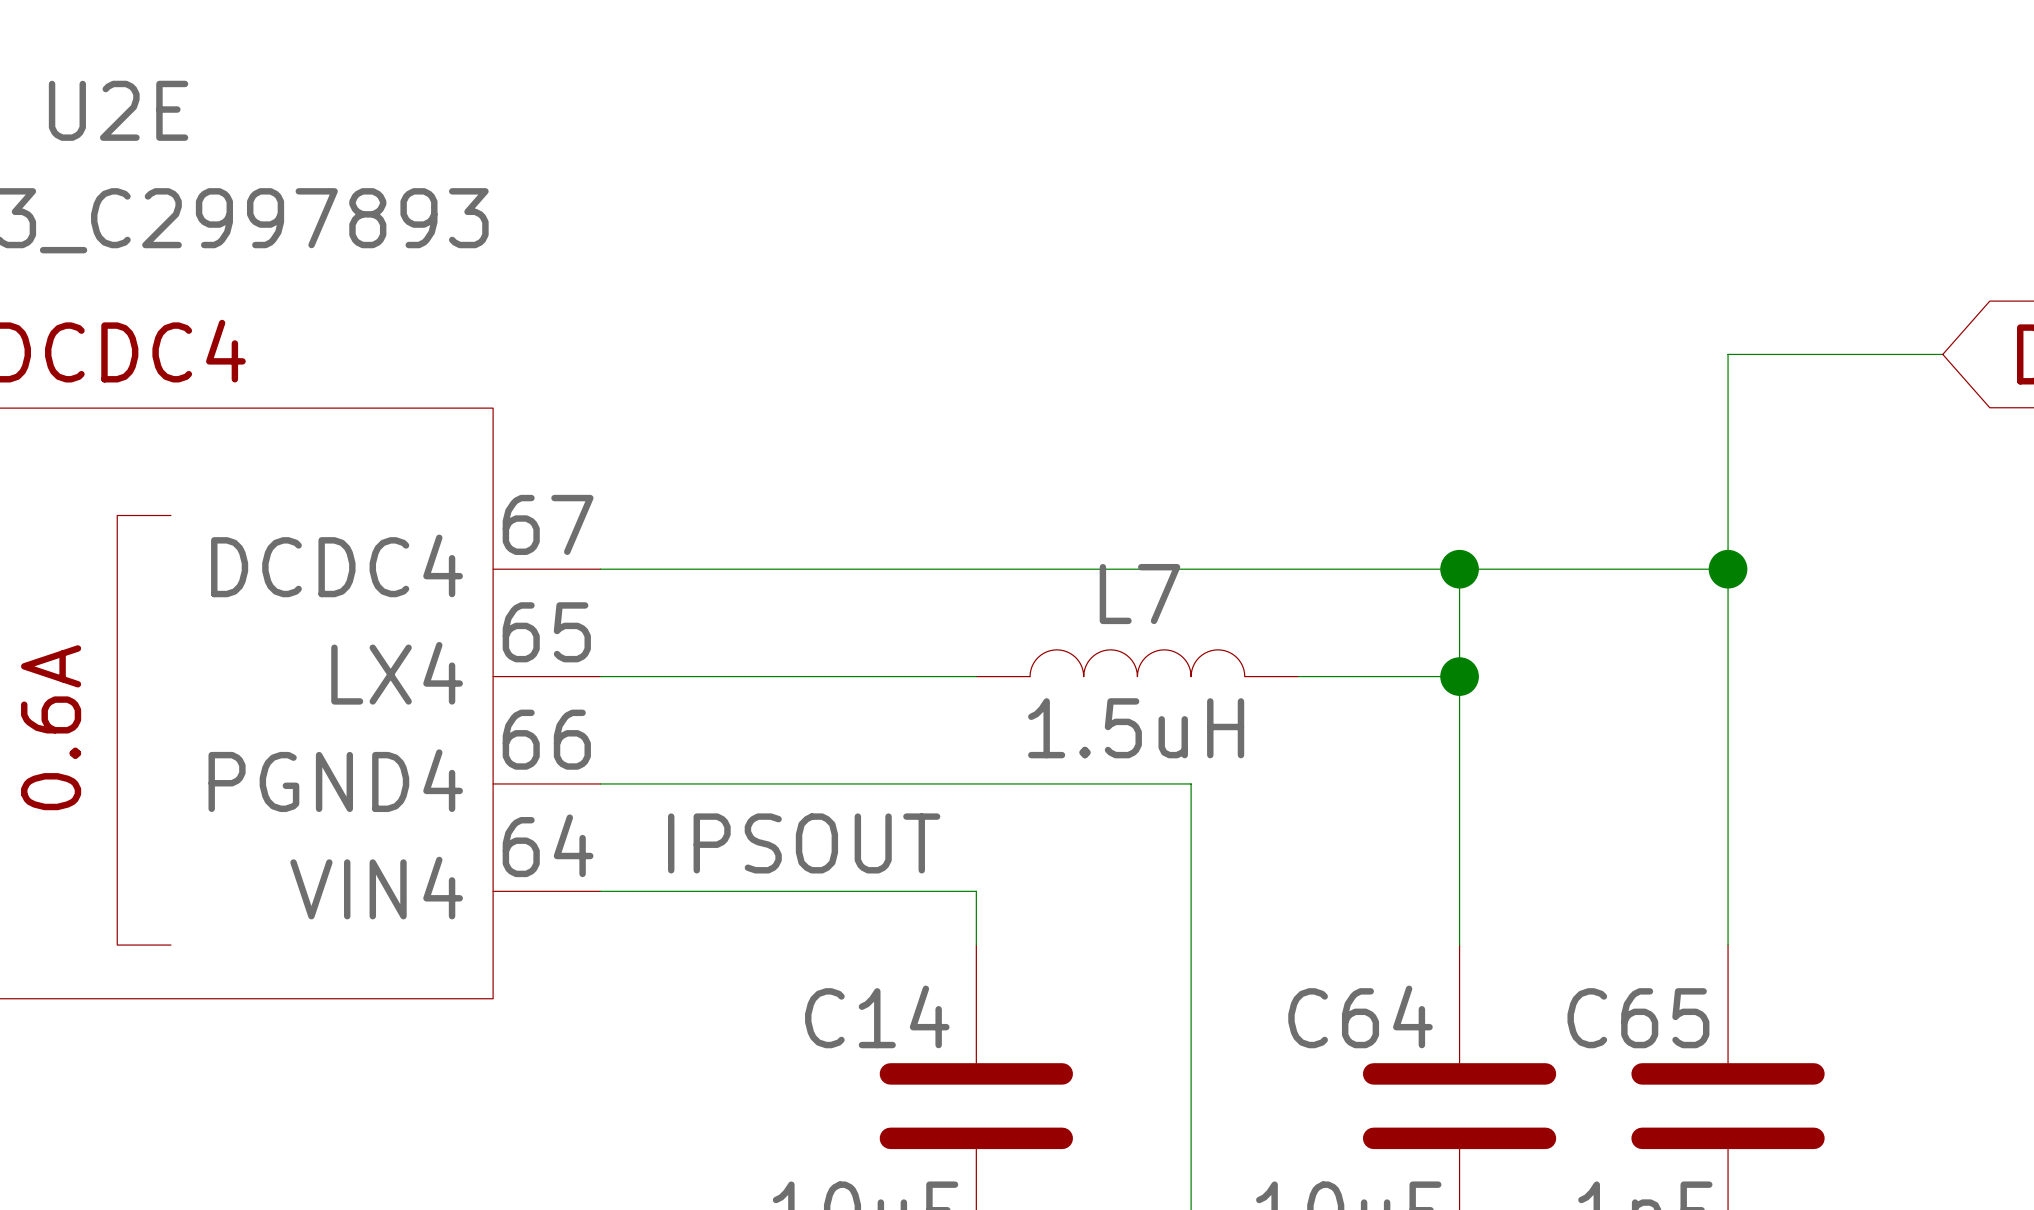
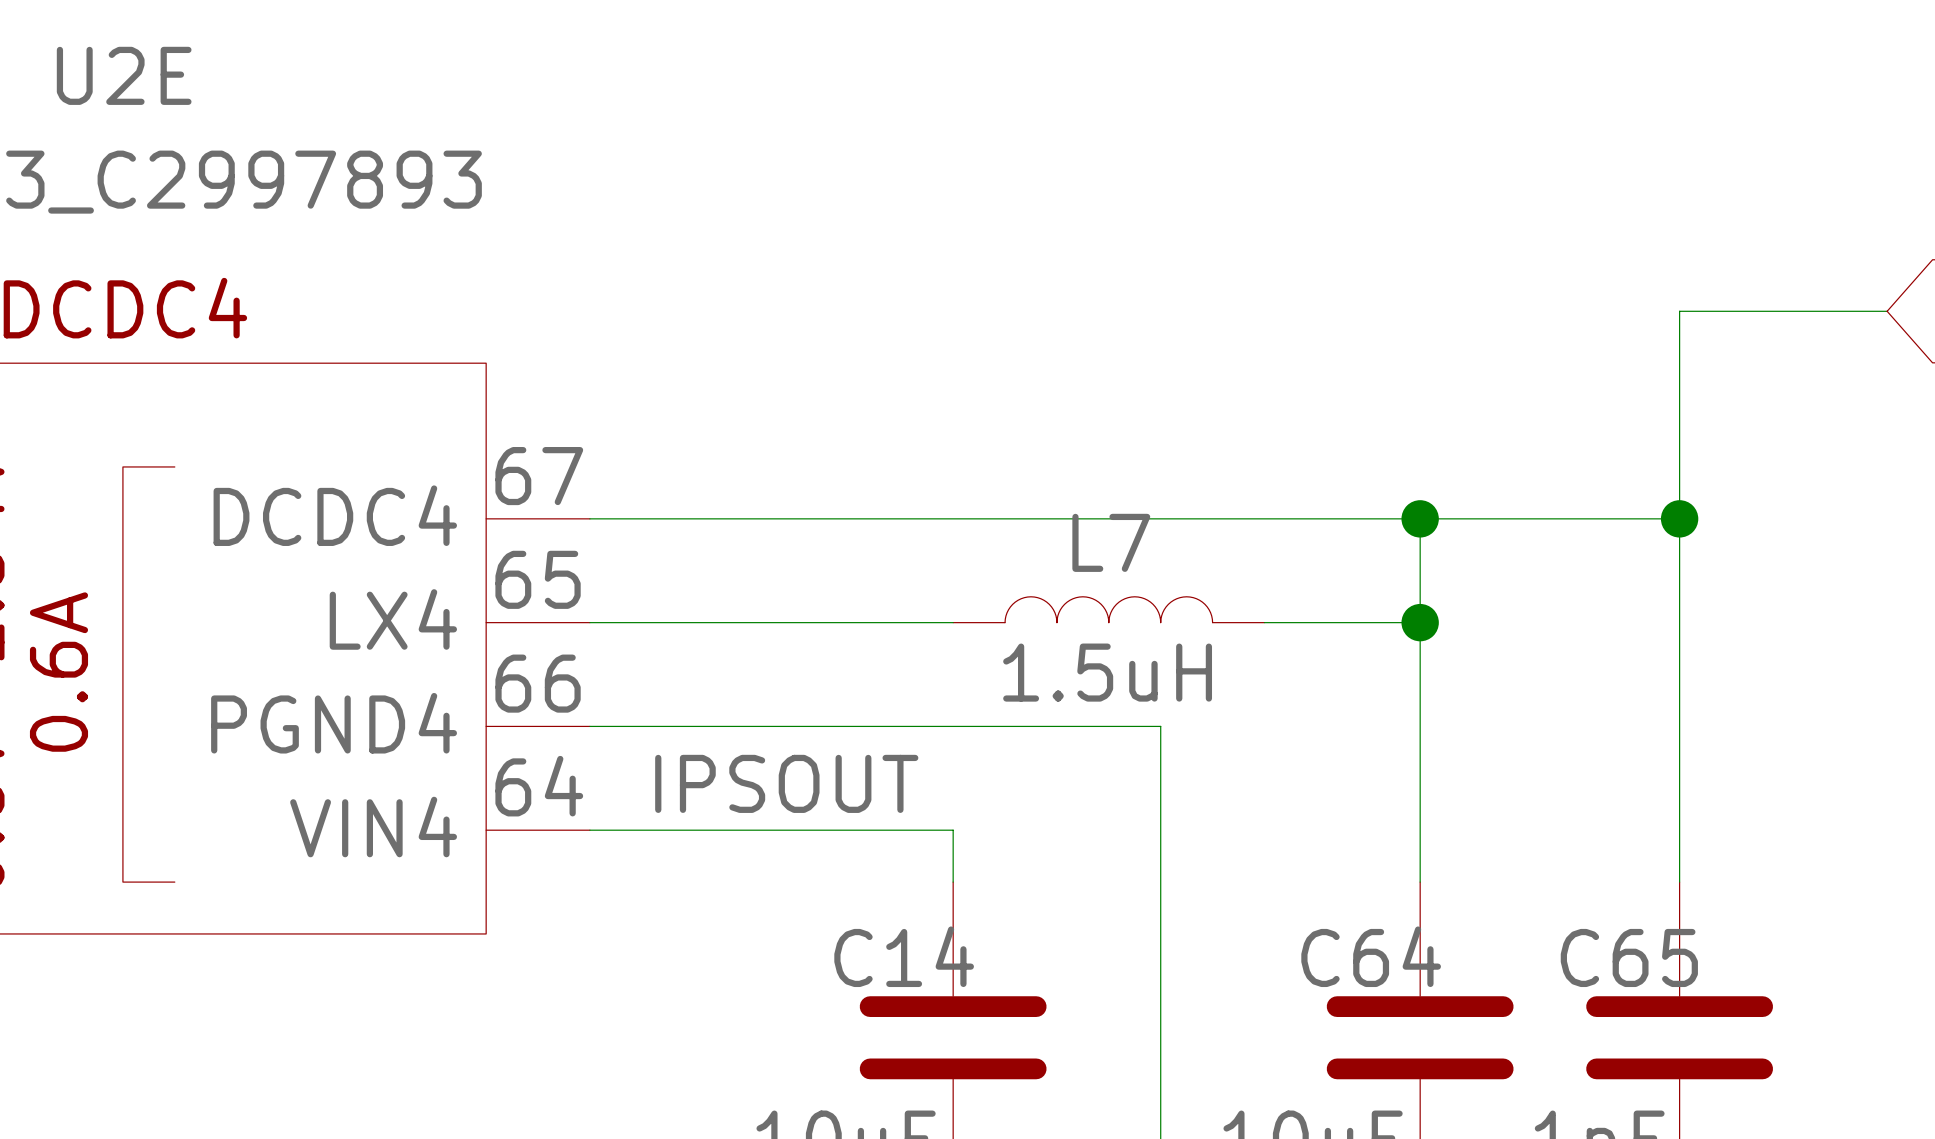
C14 name position: C14 (877, 1016) -> C14 (904, 956)
C64 name position: C64 (1360, 1016) -> C64 (1371, 956)
C65 name position: C65 (1638, 1018) -> C65 (1629, 957)

